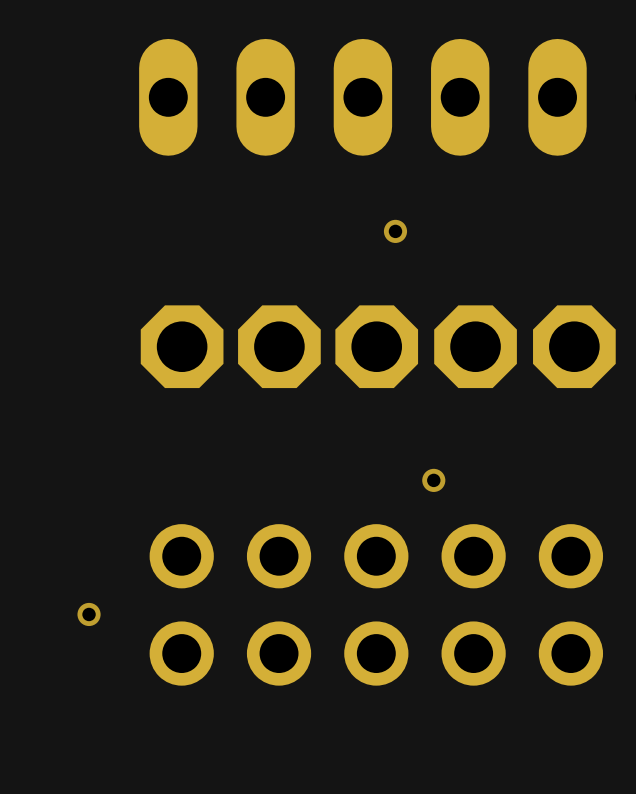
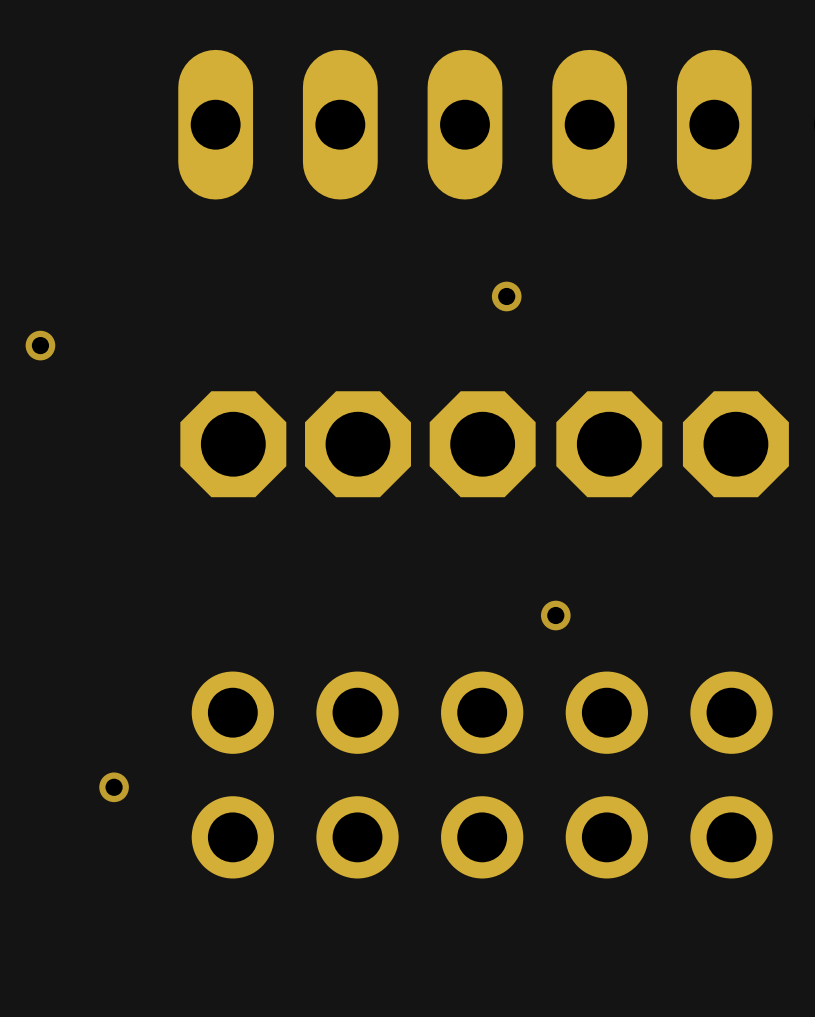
via: none -> (40, 345)

